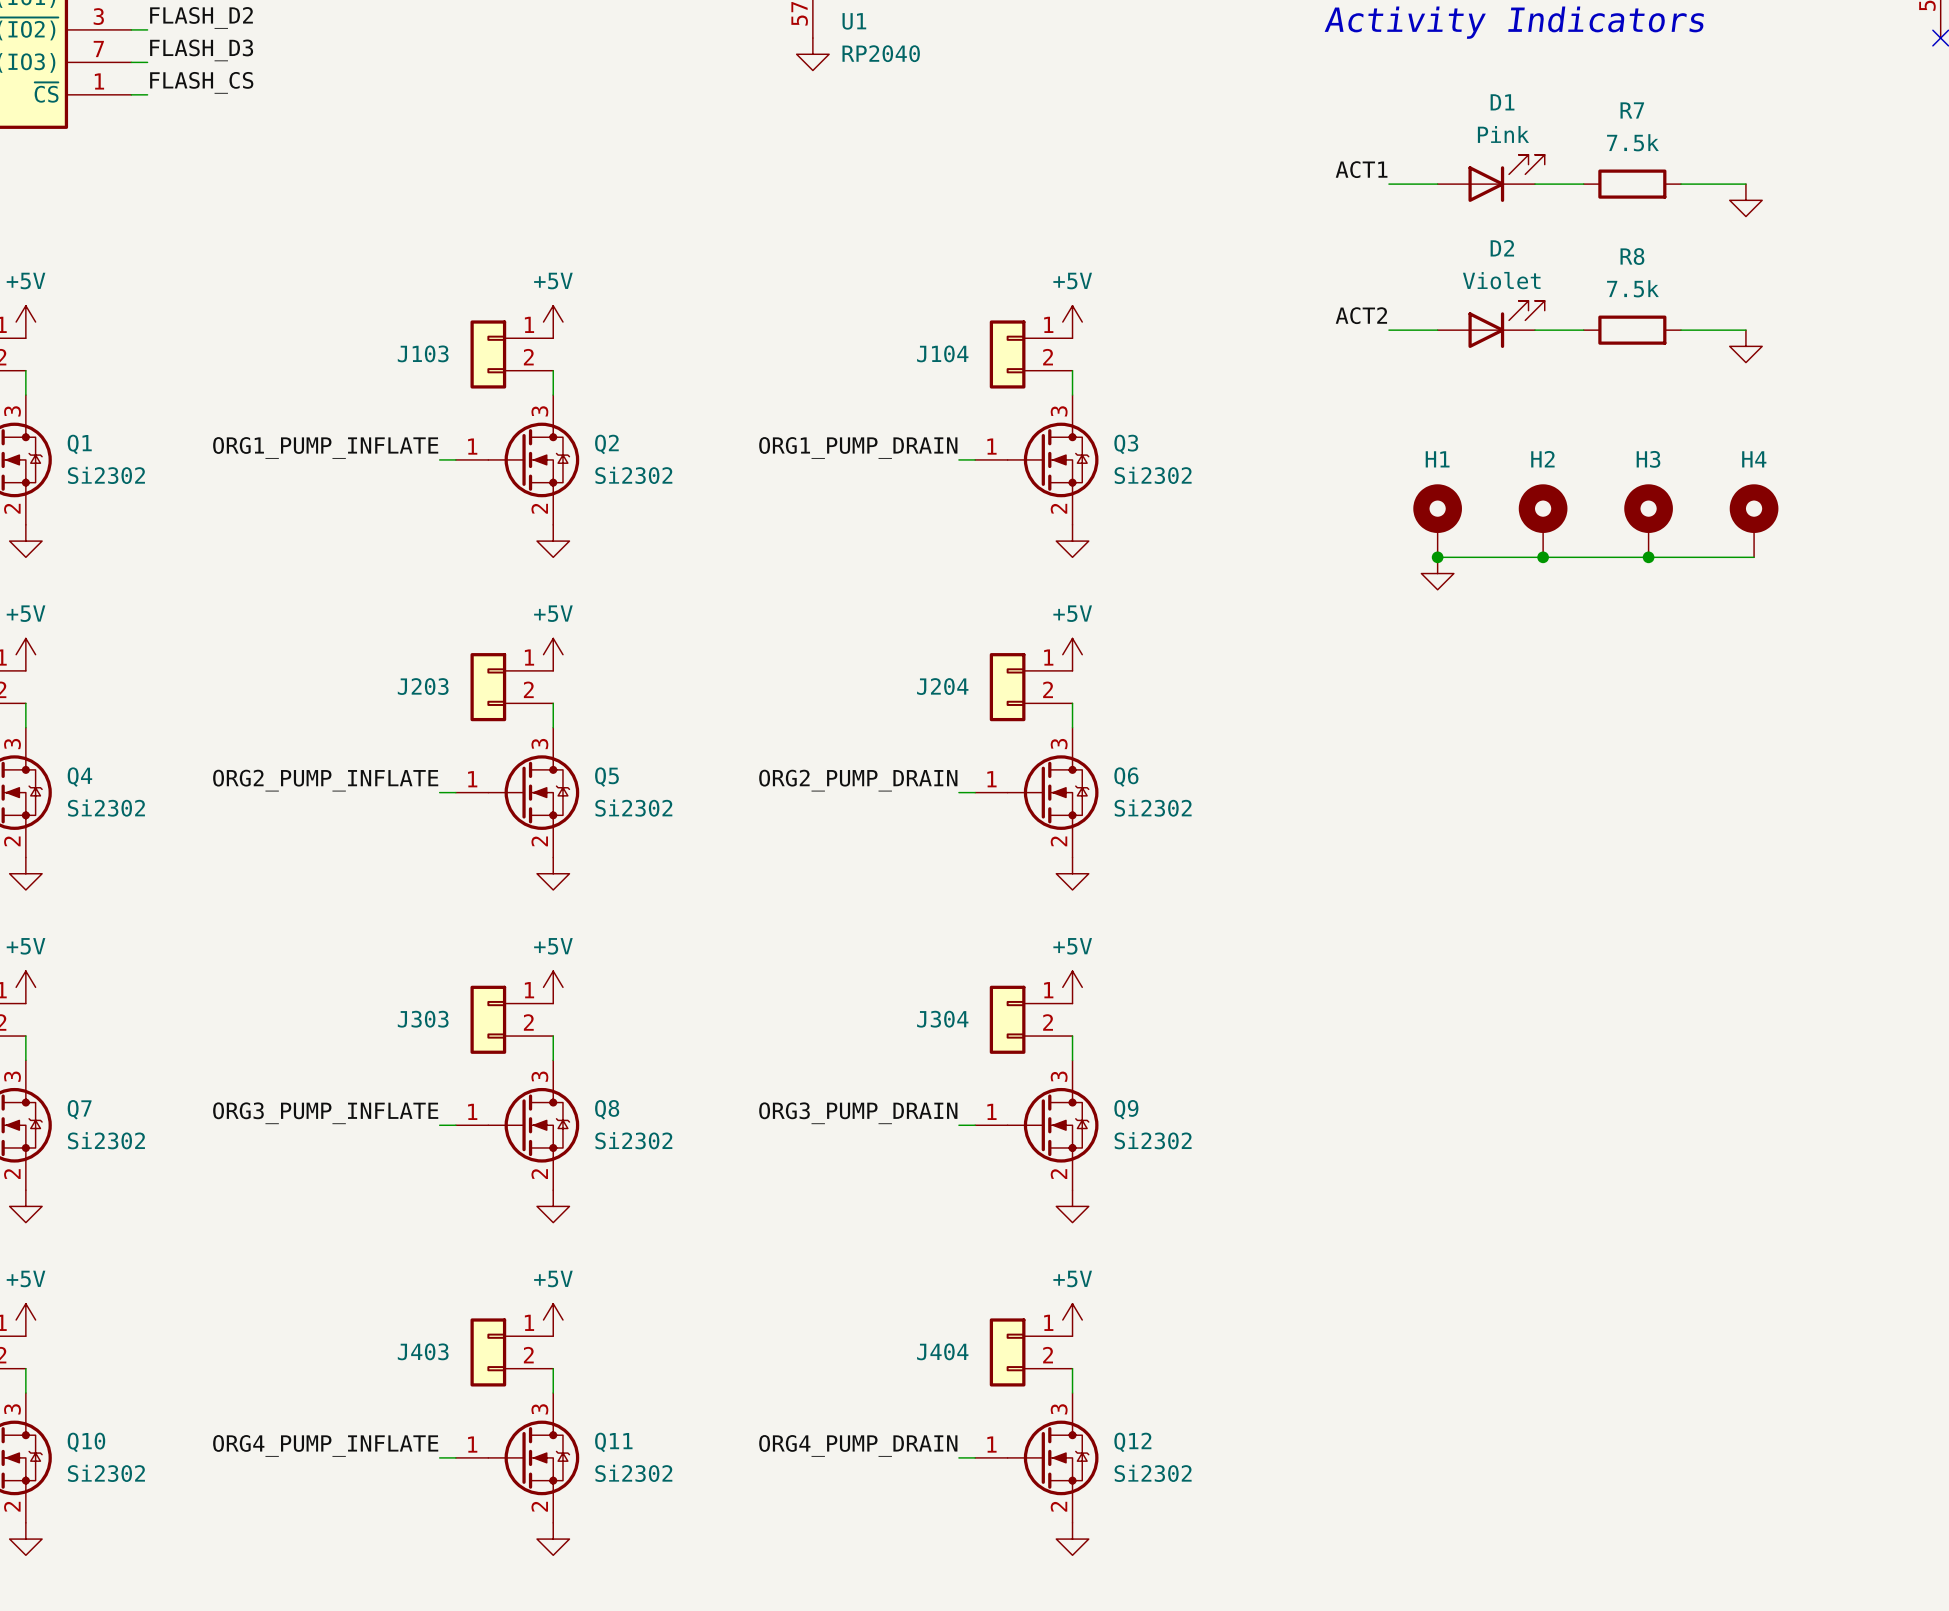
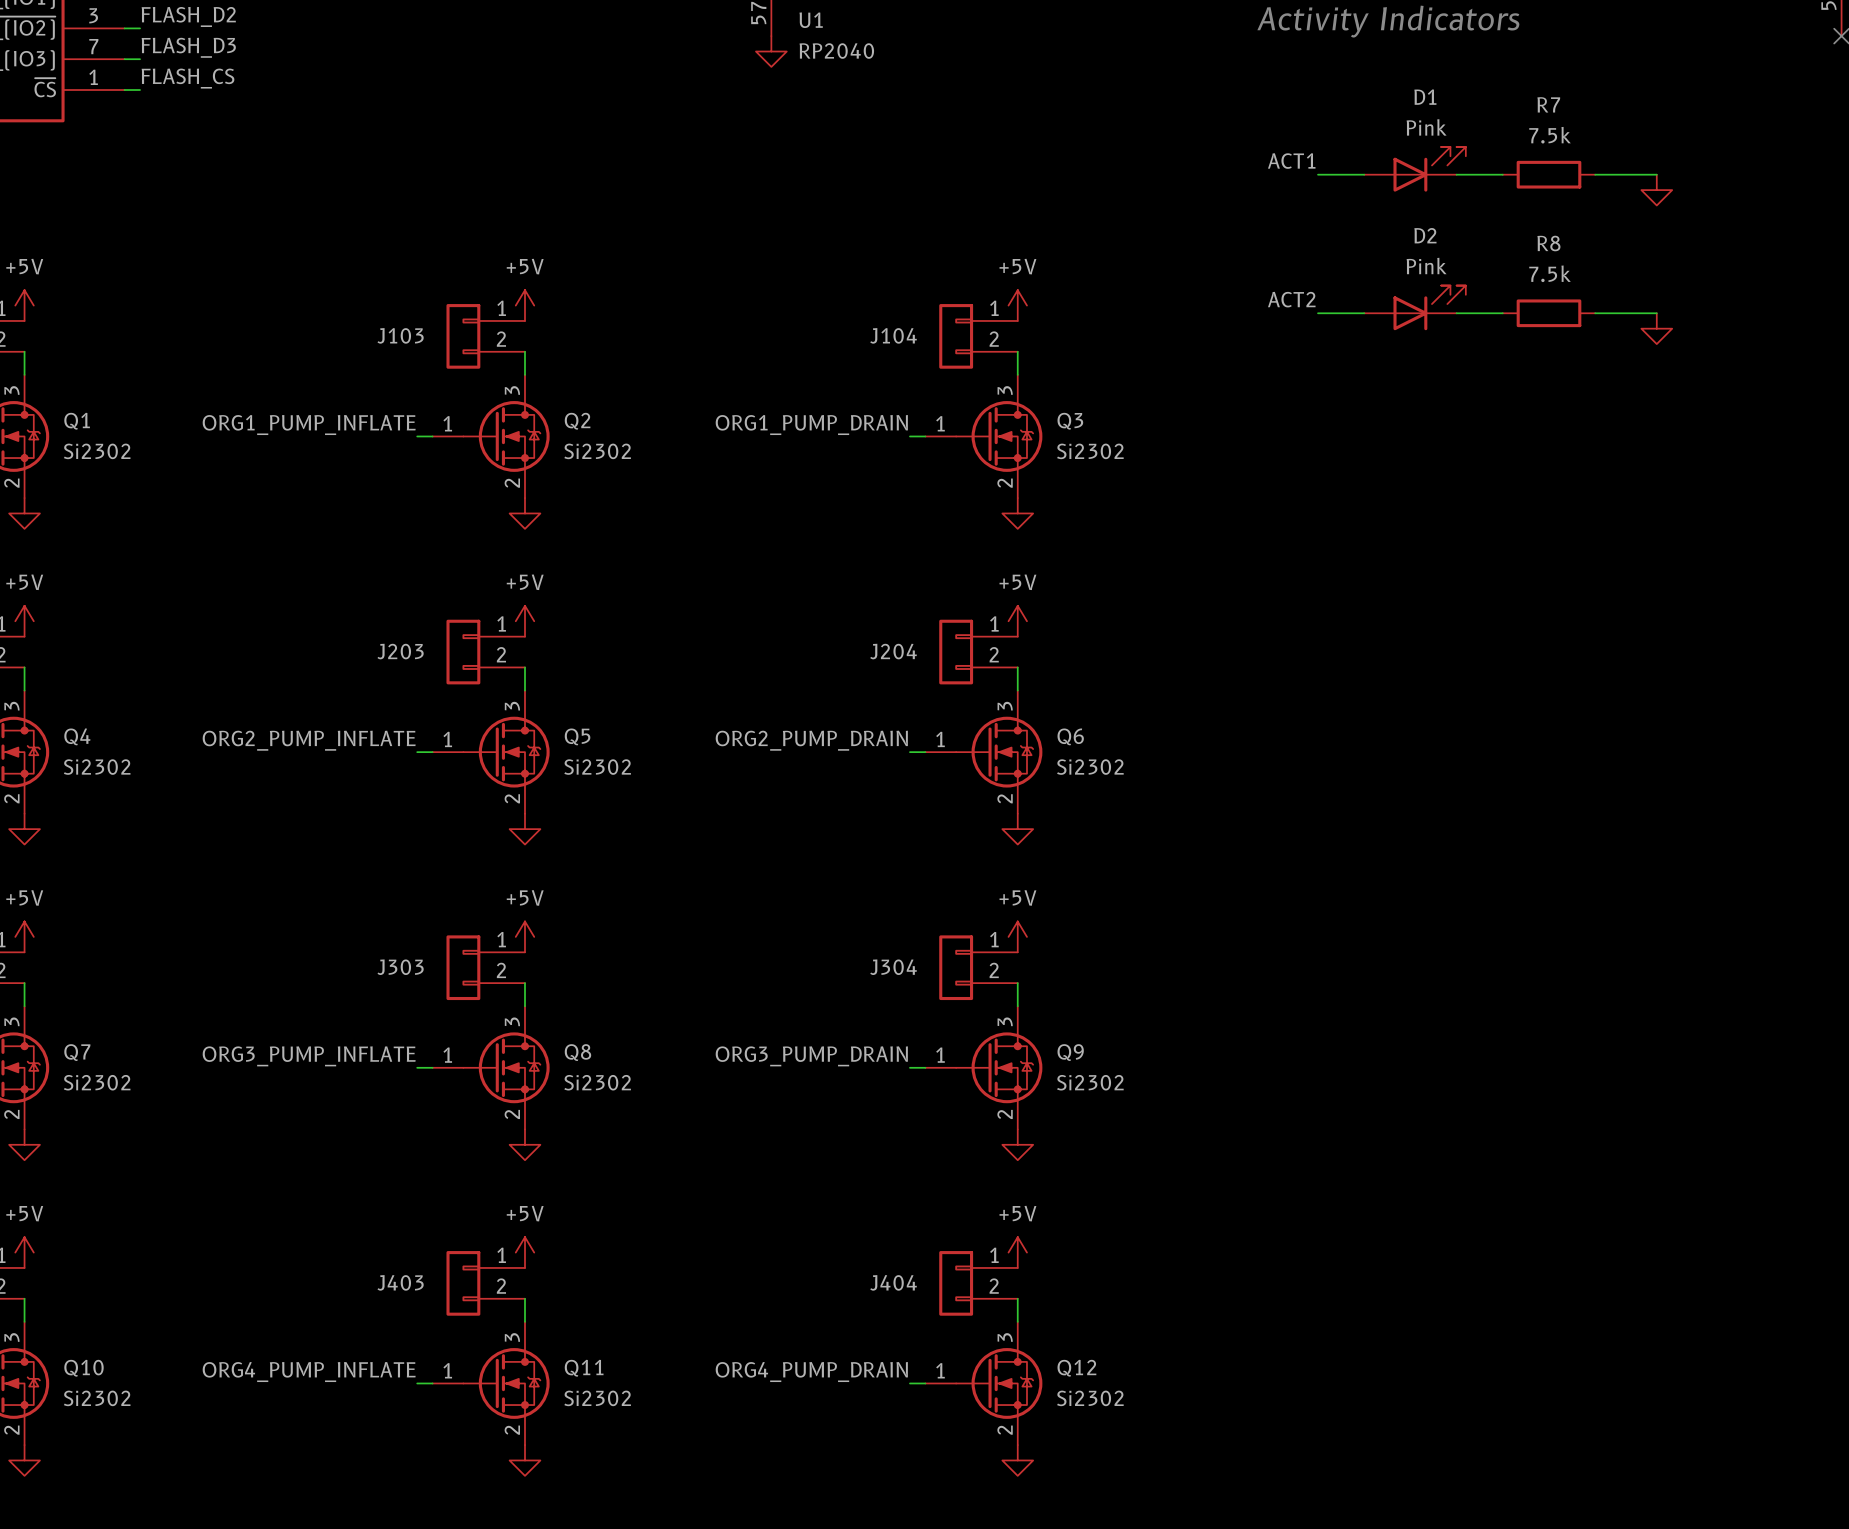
D2 value: Violet (1501, 280) -> Pink (1426, 266)
H1: (1437, 520) -> none
H2: (1543, 520) -> none
H3: (1648, 520) -> none
H4: (1754, 520) -> none
wire: (1437, 557) (1754, 557) -> none
junction: (1437, 557) -> none
junction: (1543, 557) -> none
junction: (1648, 557) -> none
power symbol: (1437, 573) -> none

